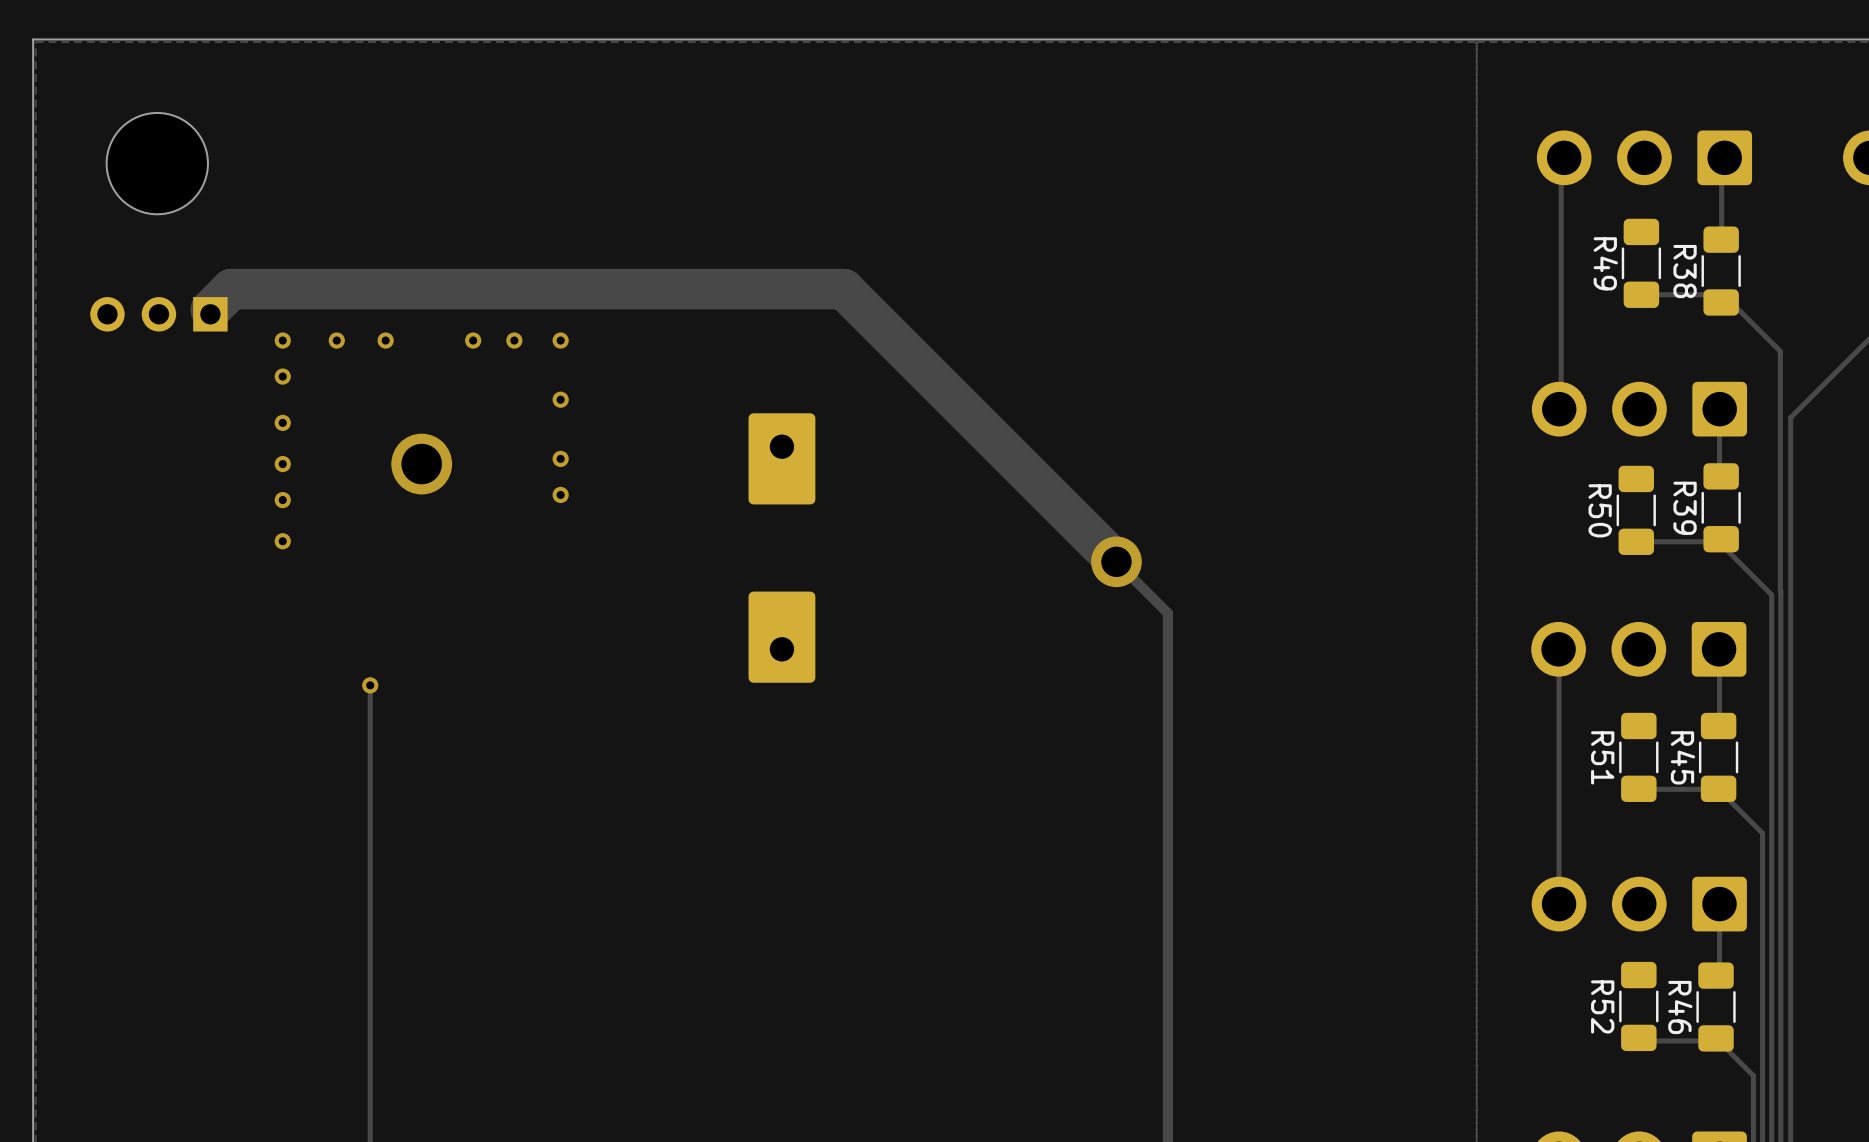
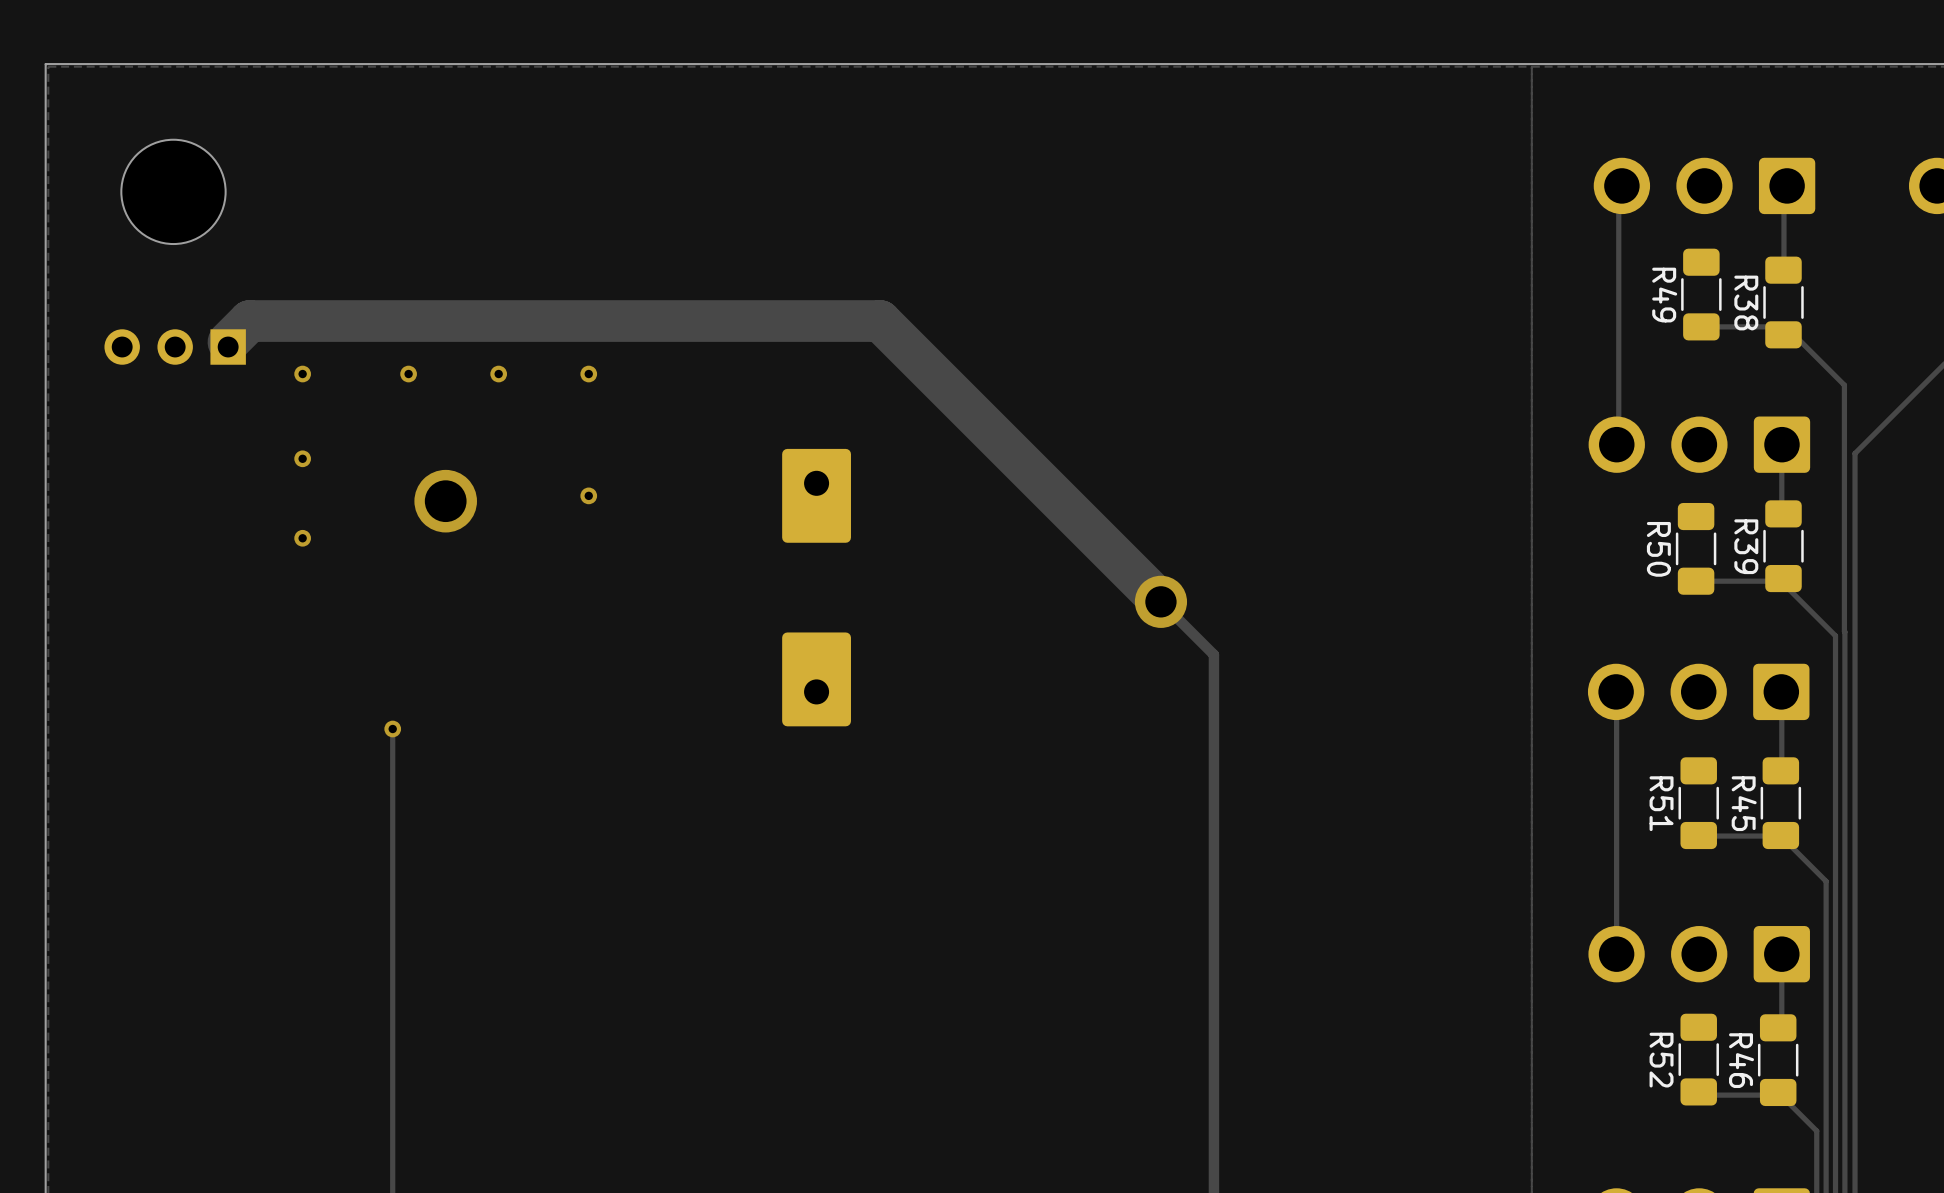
via: (336, 340) -> none
via: (514, 340) -> none
via: (282, 376) -> none
via: (560, 399) -> none
via: (282, 464) -> none
via: (560, 494) -> none
via: (282, 541) -> none

